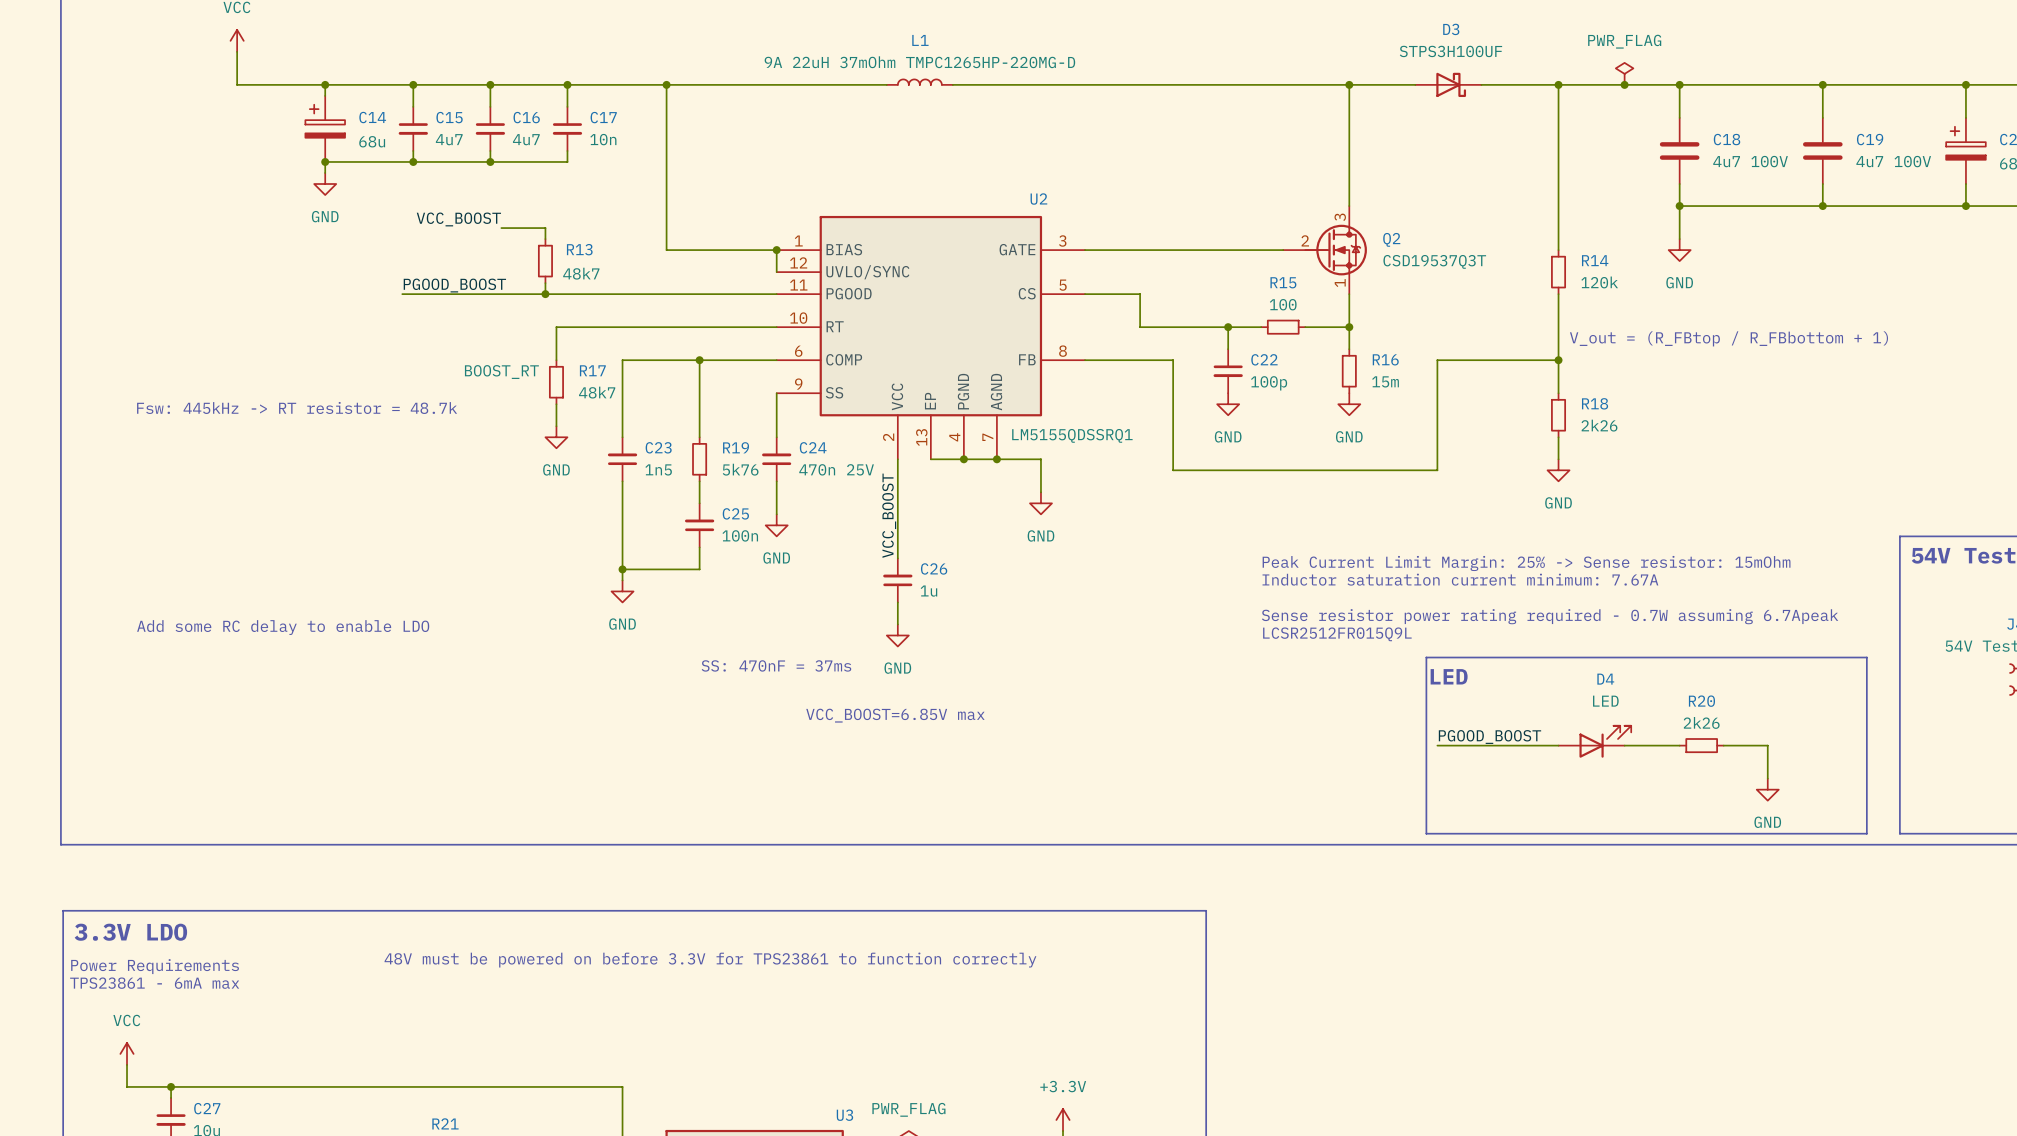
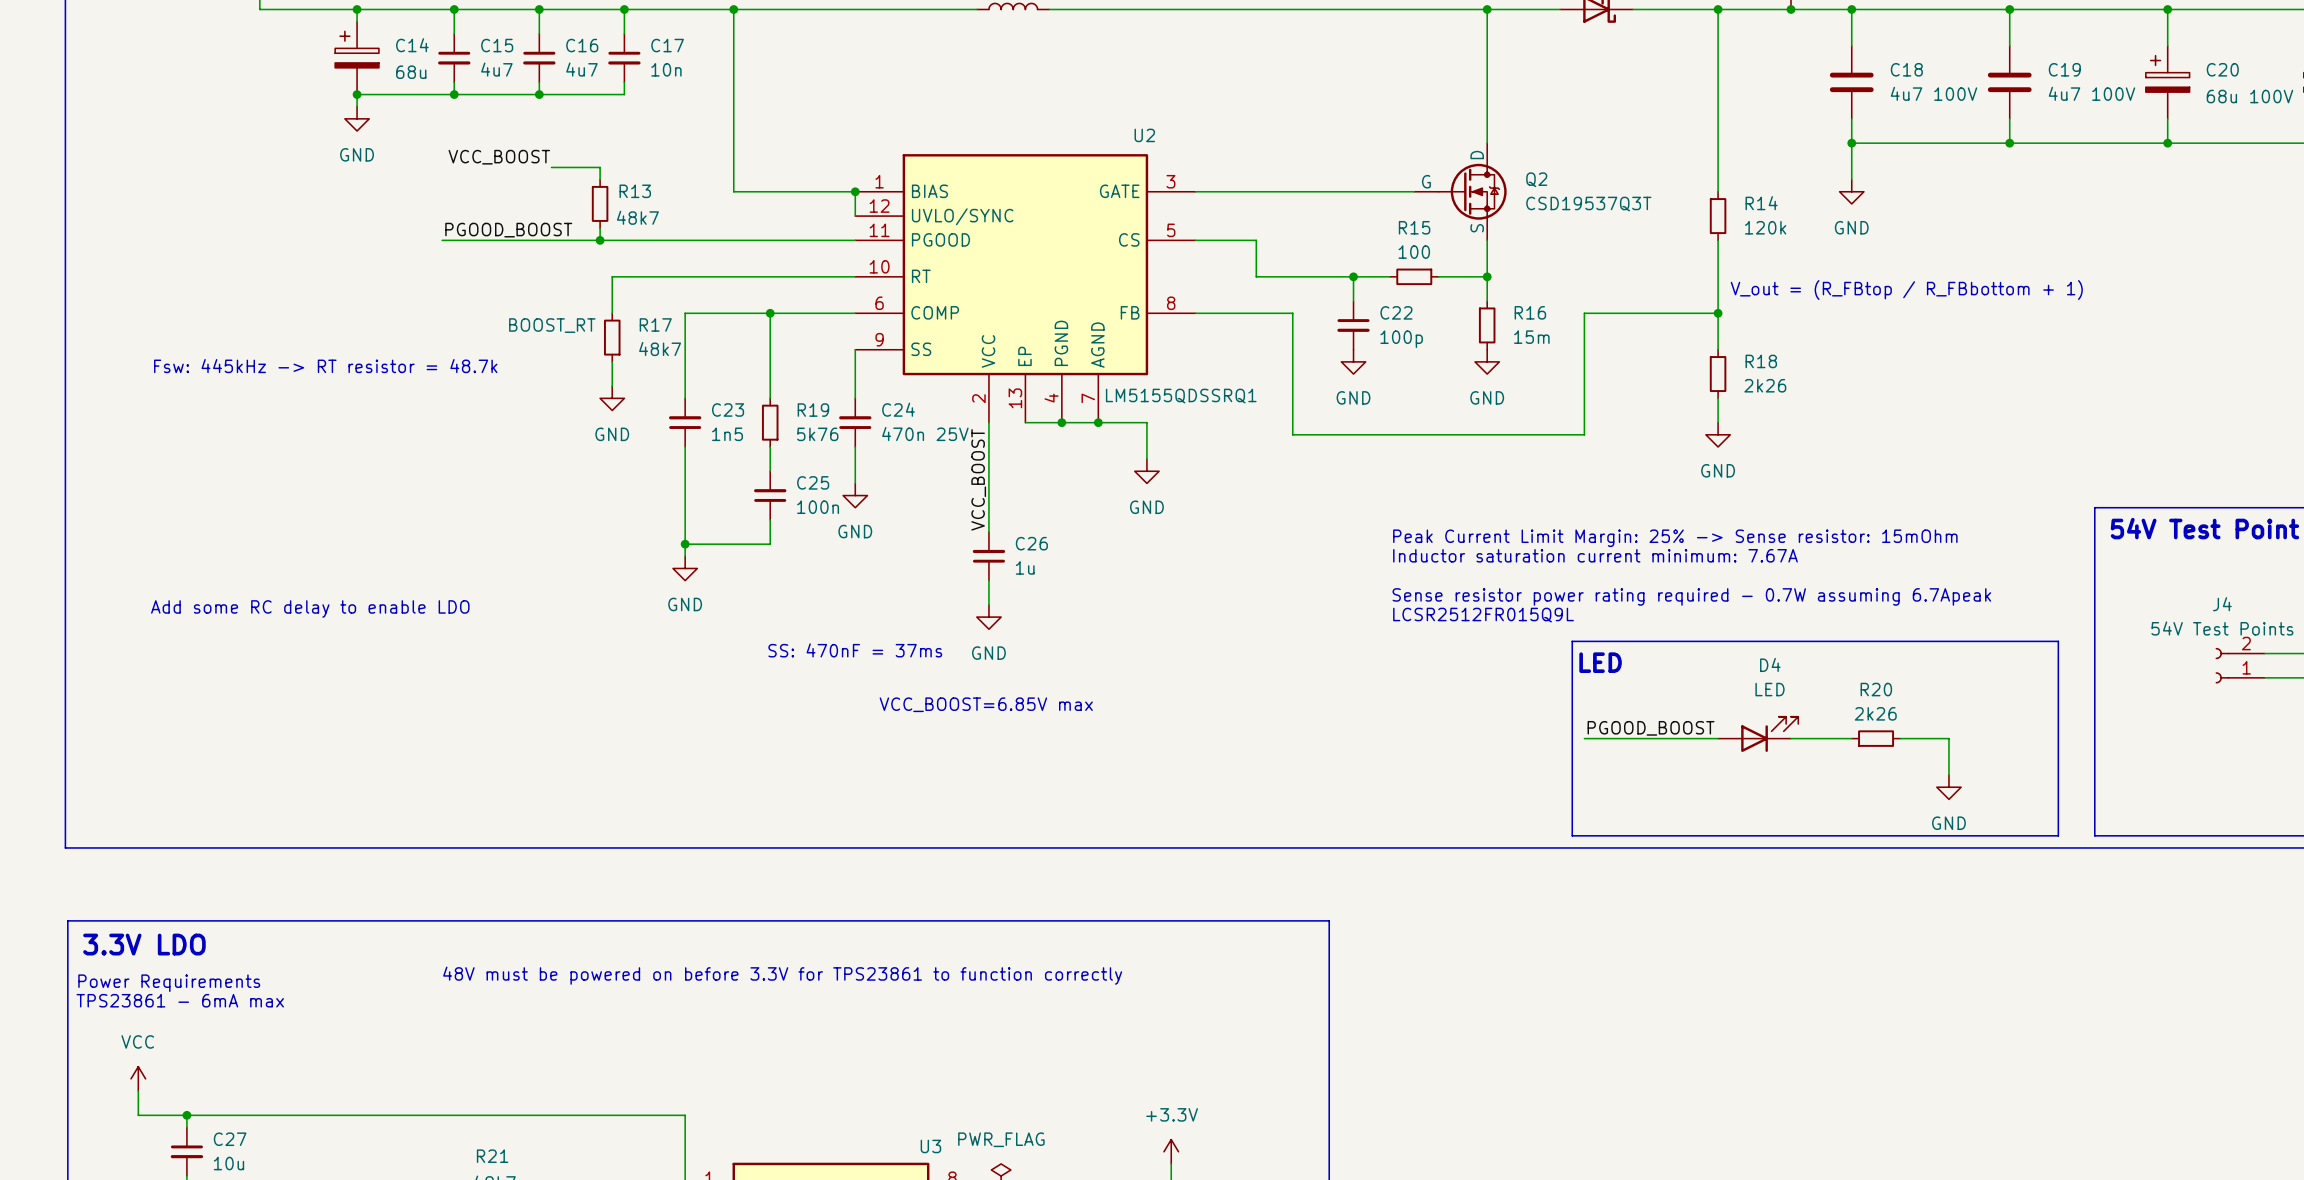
Q2 symbol: [1283, 206, 1367, 295] -> [1414, 143, 1507, 241]

